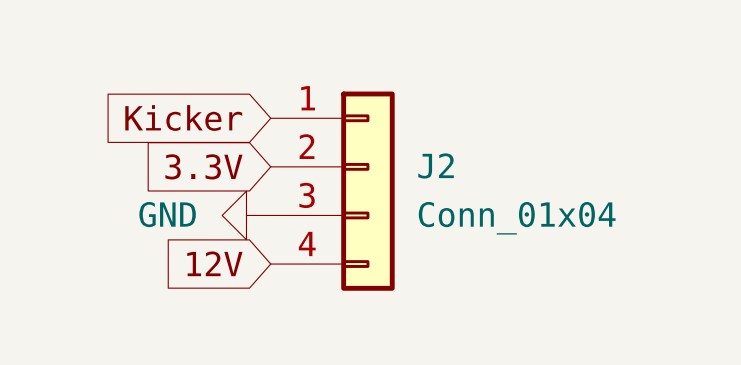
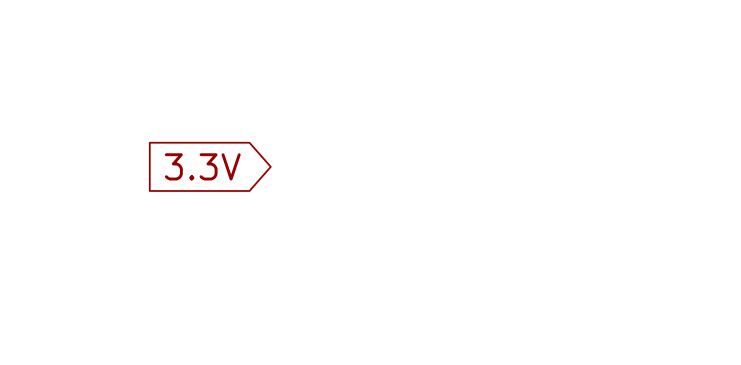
global label: Kicker (183, 118) -> none
J2: Conn_01x04 (332, 191) -> none
power symbol: GND (246, 215) -> none
global label: 12V (214, 263) -> none

